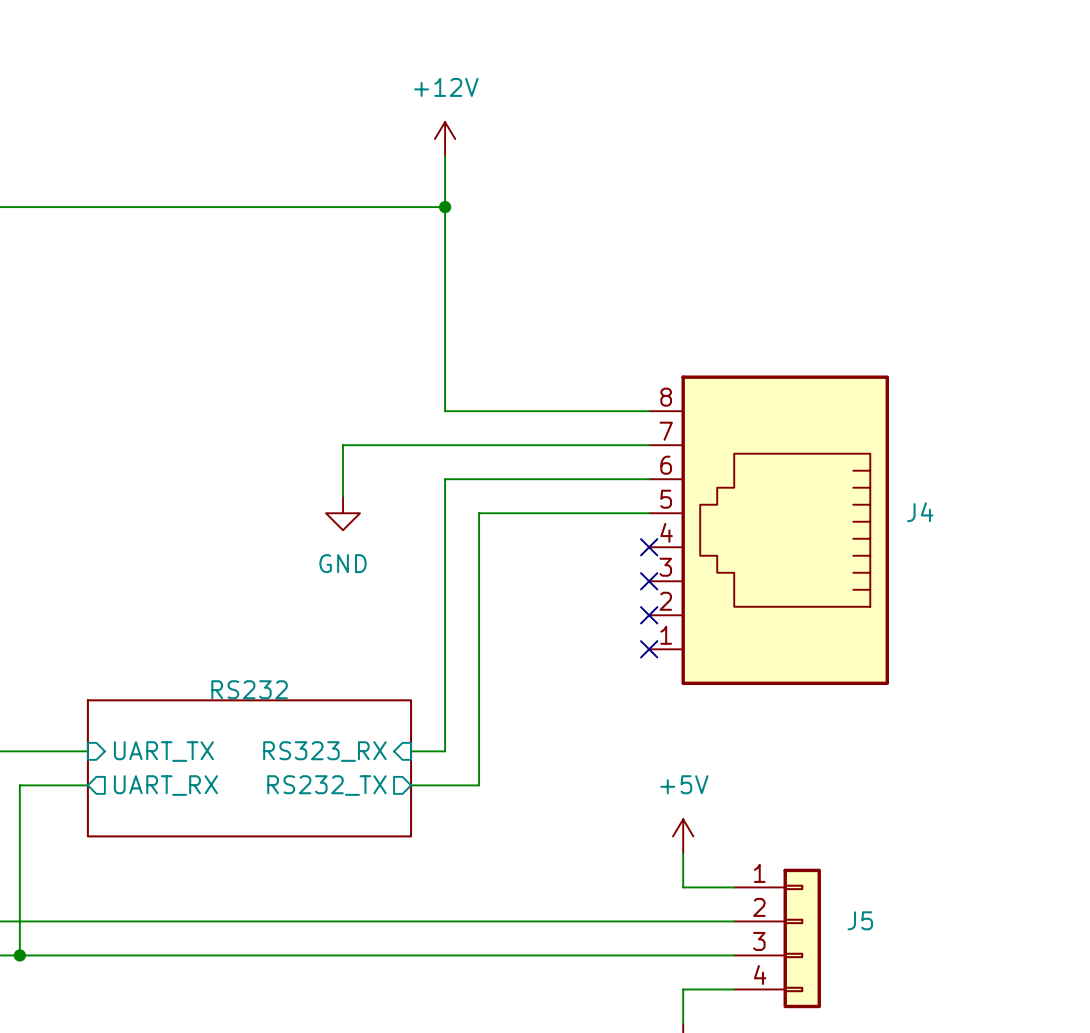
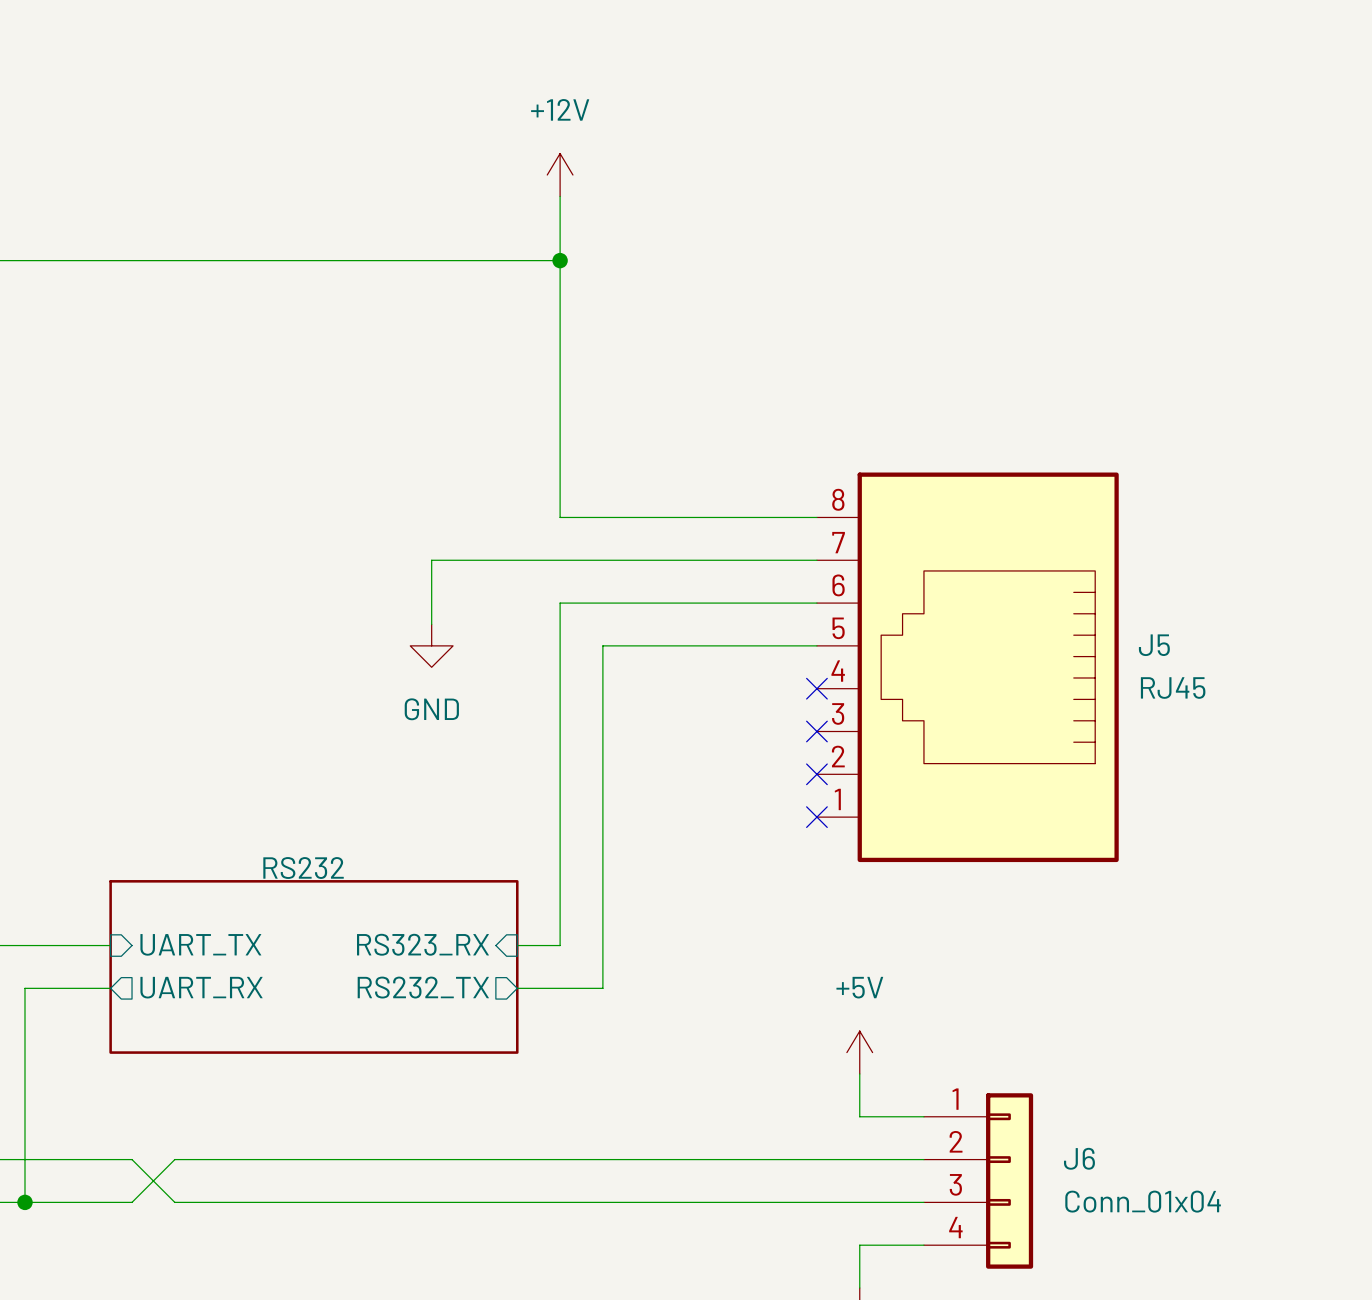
J4 name: J4 (920, 512) -> J5 (1154, 645)
J4 value: none -> RJ45 (1173, 688)
J5 name: J5 (860, 920) -> J6 (1079, 1158)
wire: (104, 921) (138, 921) -> (132, 1159) (174, 1202)
wire: (104, 955) (138, 955) -> (132, 1202) (174, 1159)
J5 value: none -> Conn_01x04 (1143, 1201)

